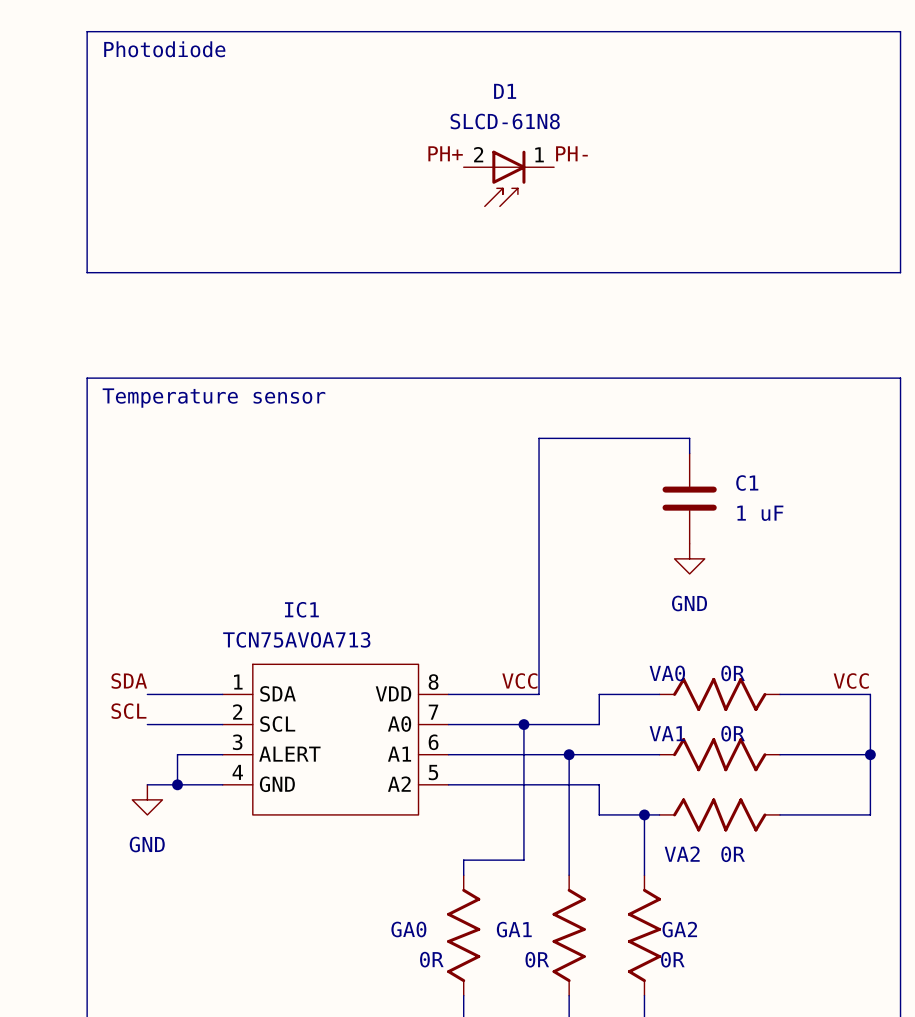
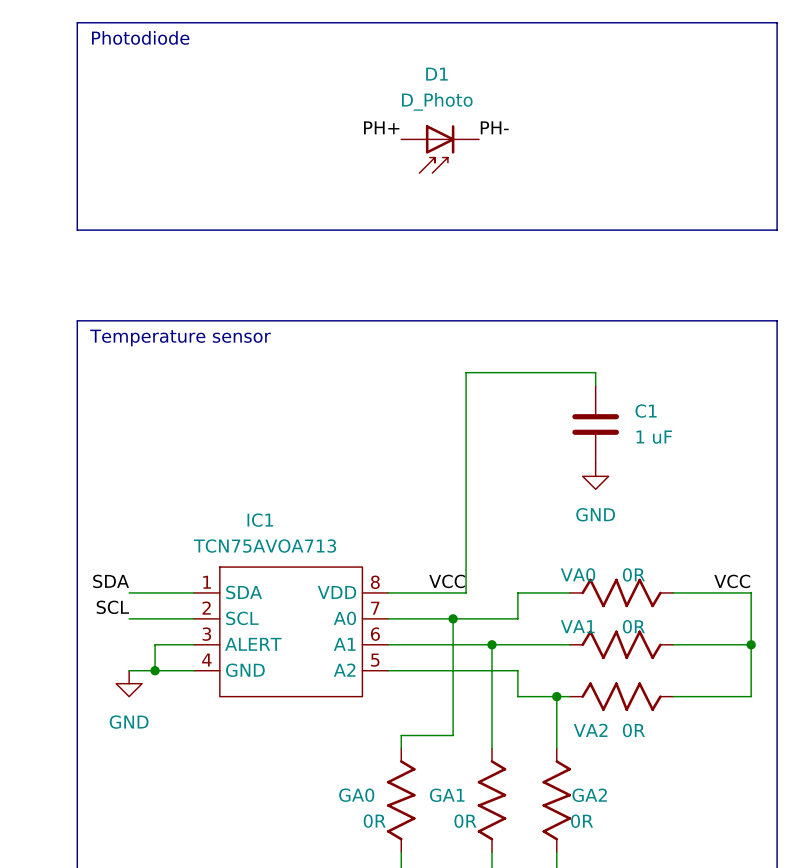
D1 value: SLCD-61N8 (505, 121) -> D_Photo (437, 101)
D1 pin number: 2 (478, 154) -> none
D1 pin number: 1 (539, 154) -> none

